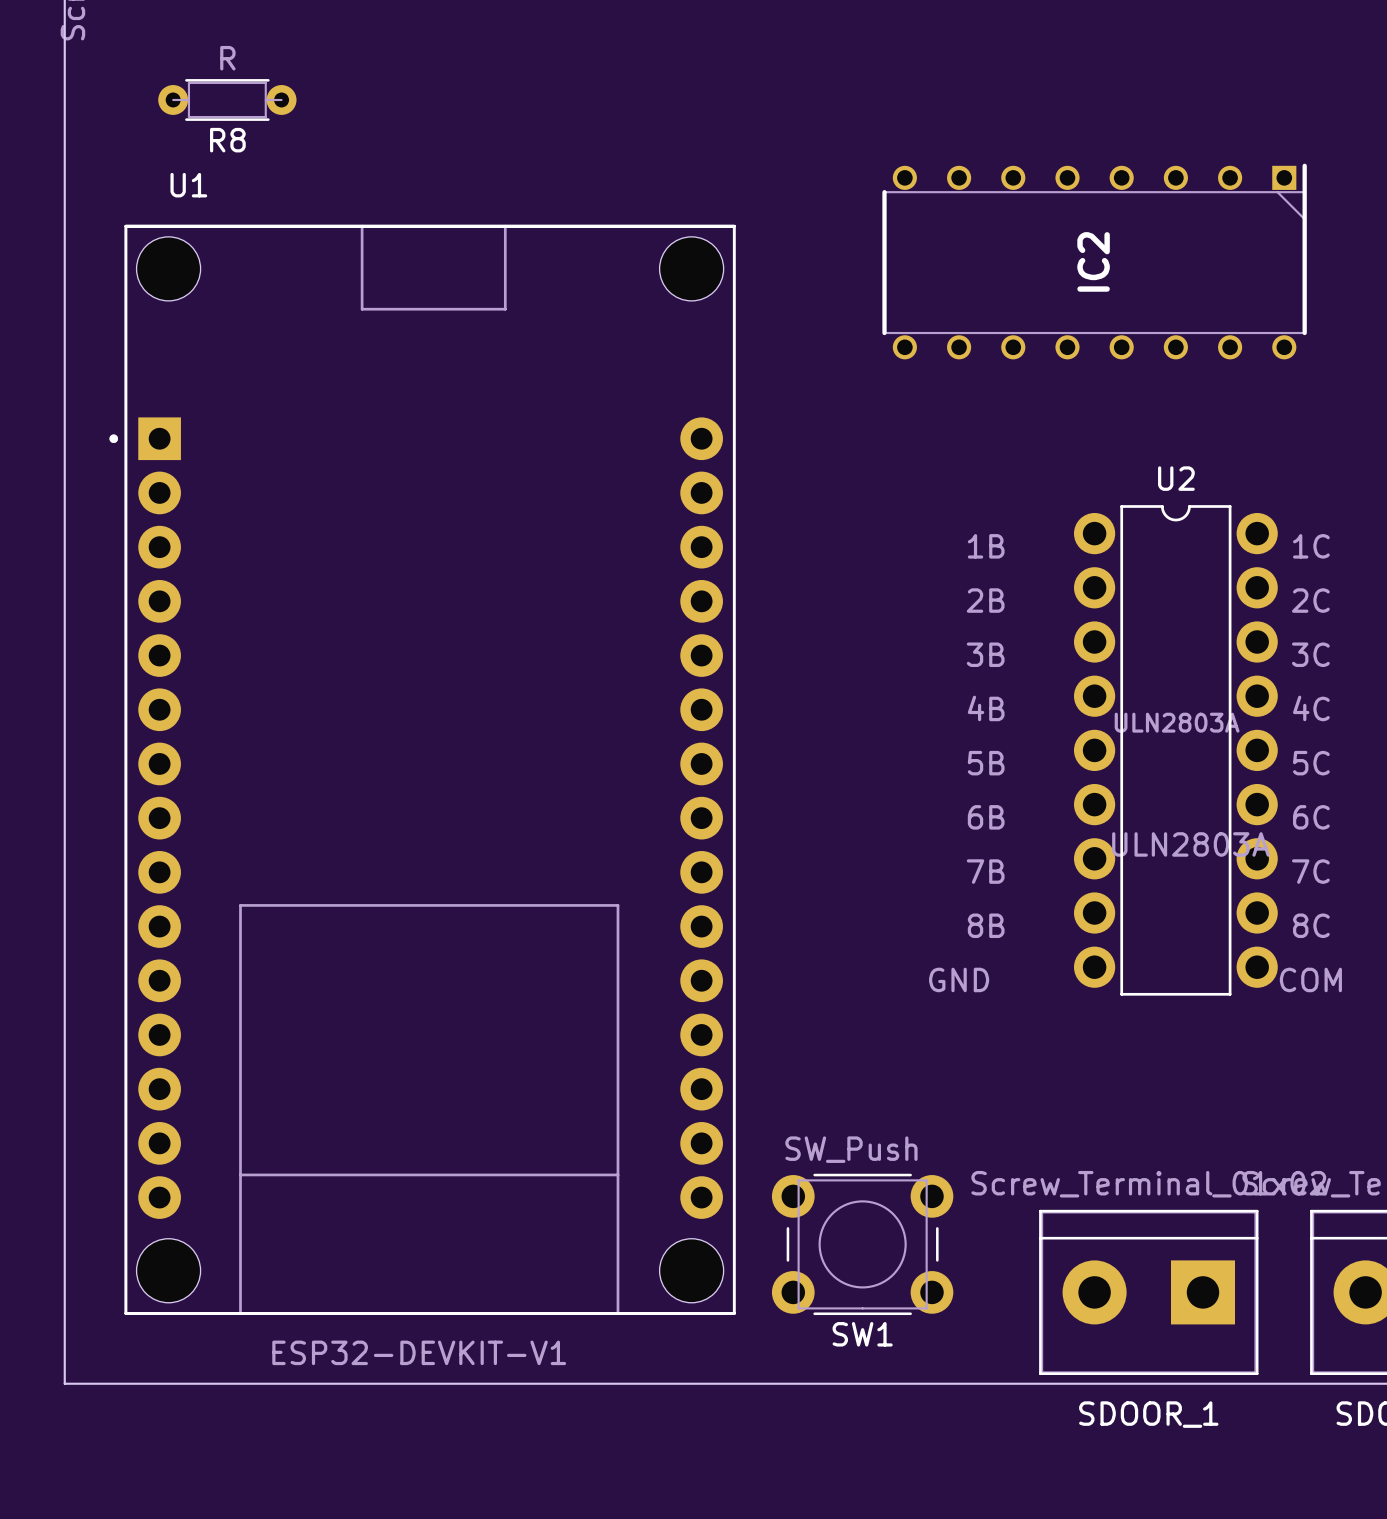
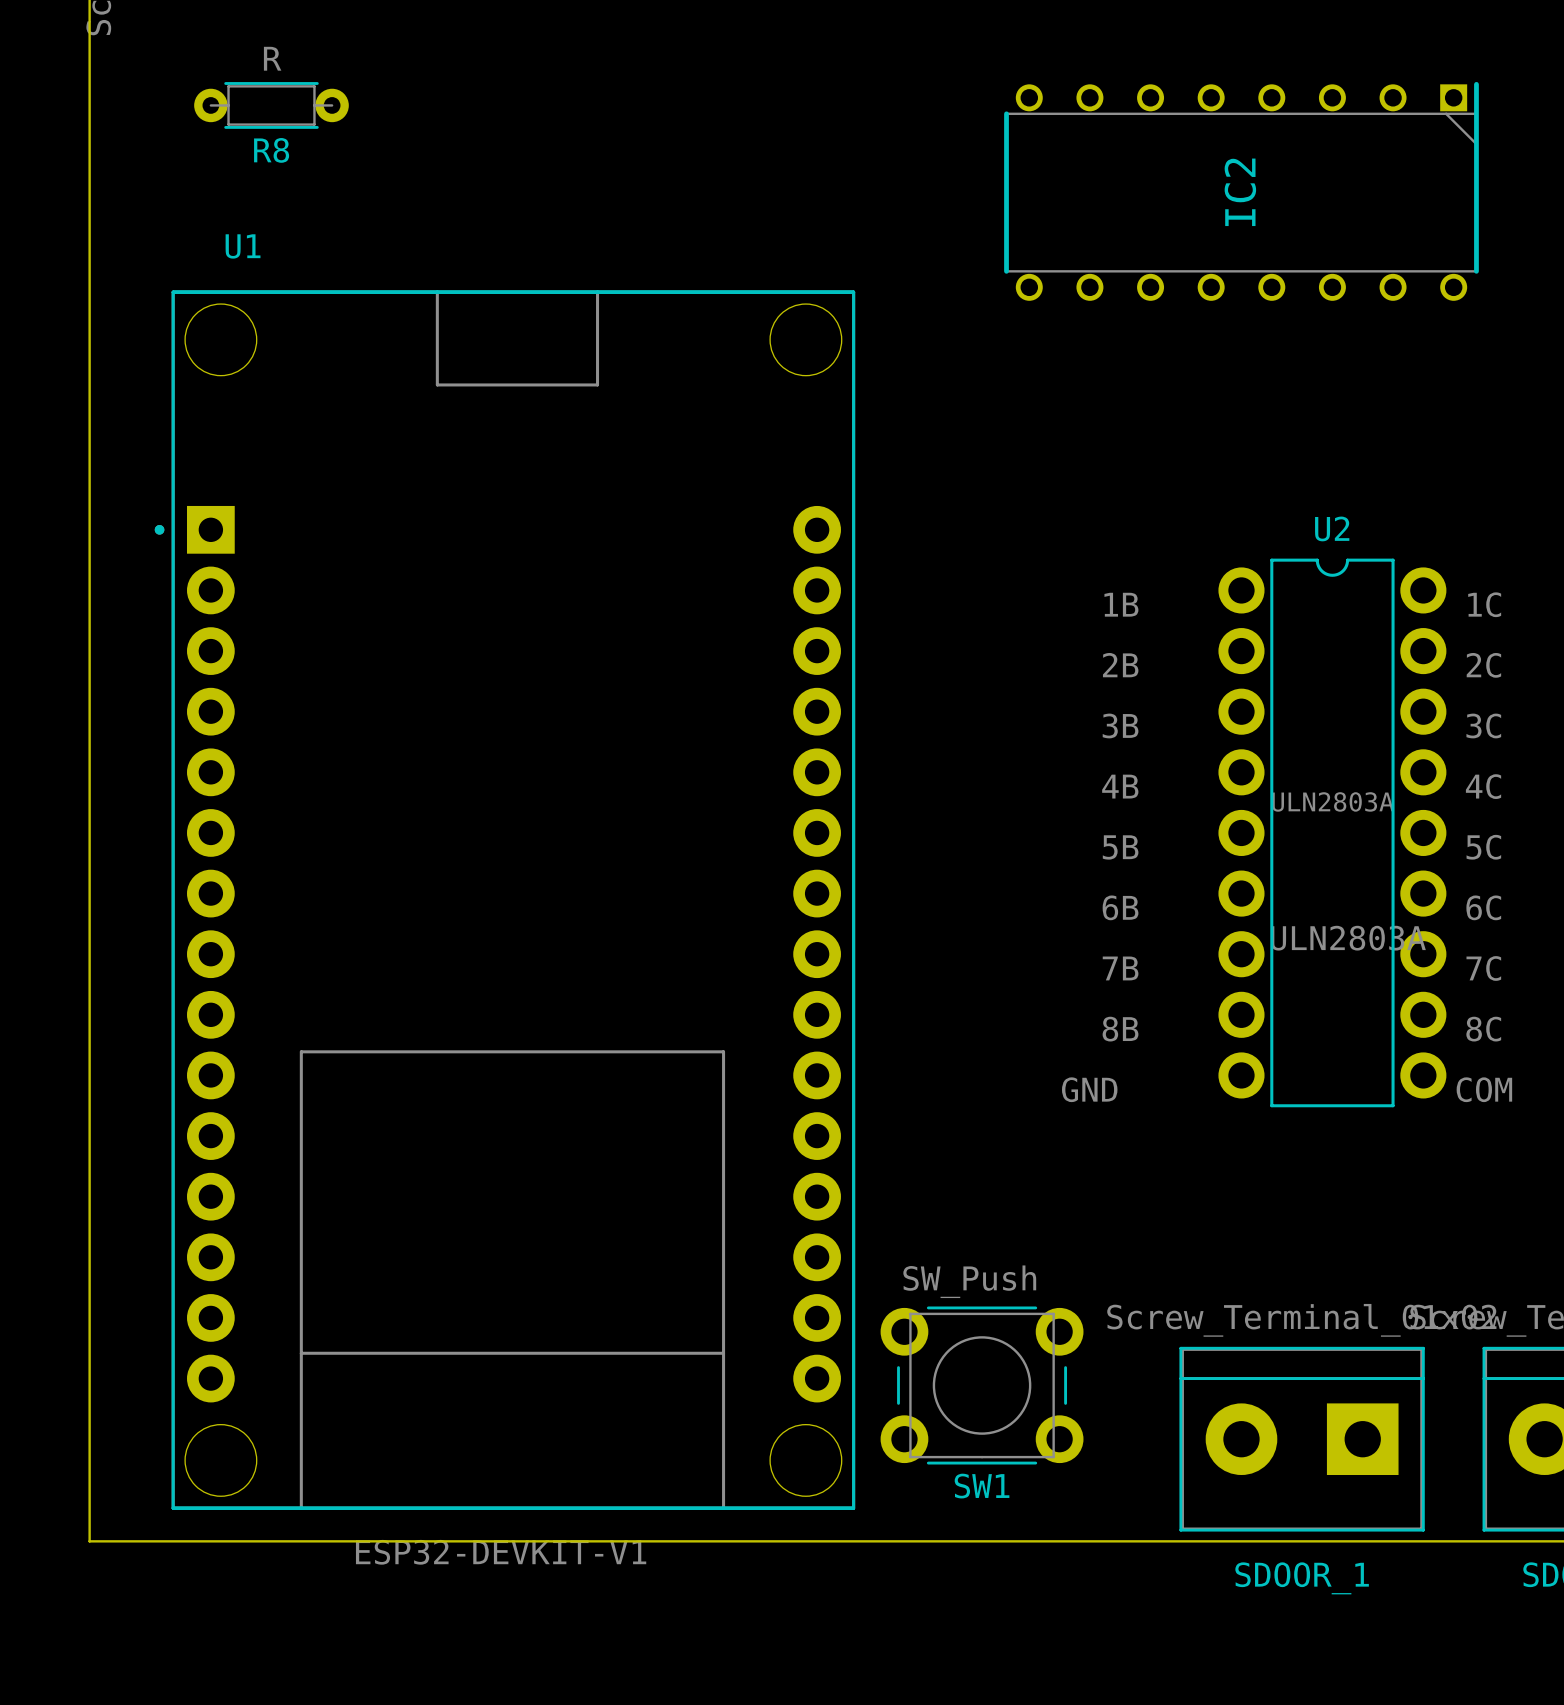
IC2 position: (1094, 261) -> (1241, 191)
U1 position: (422, 769) -> (504, 900)

